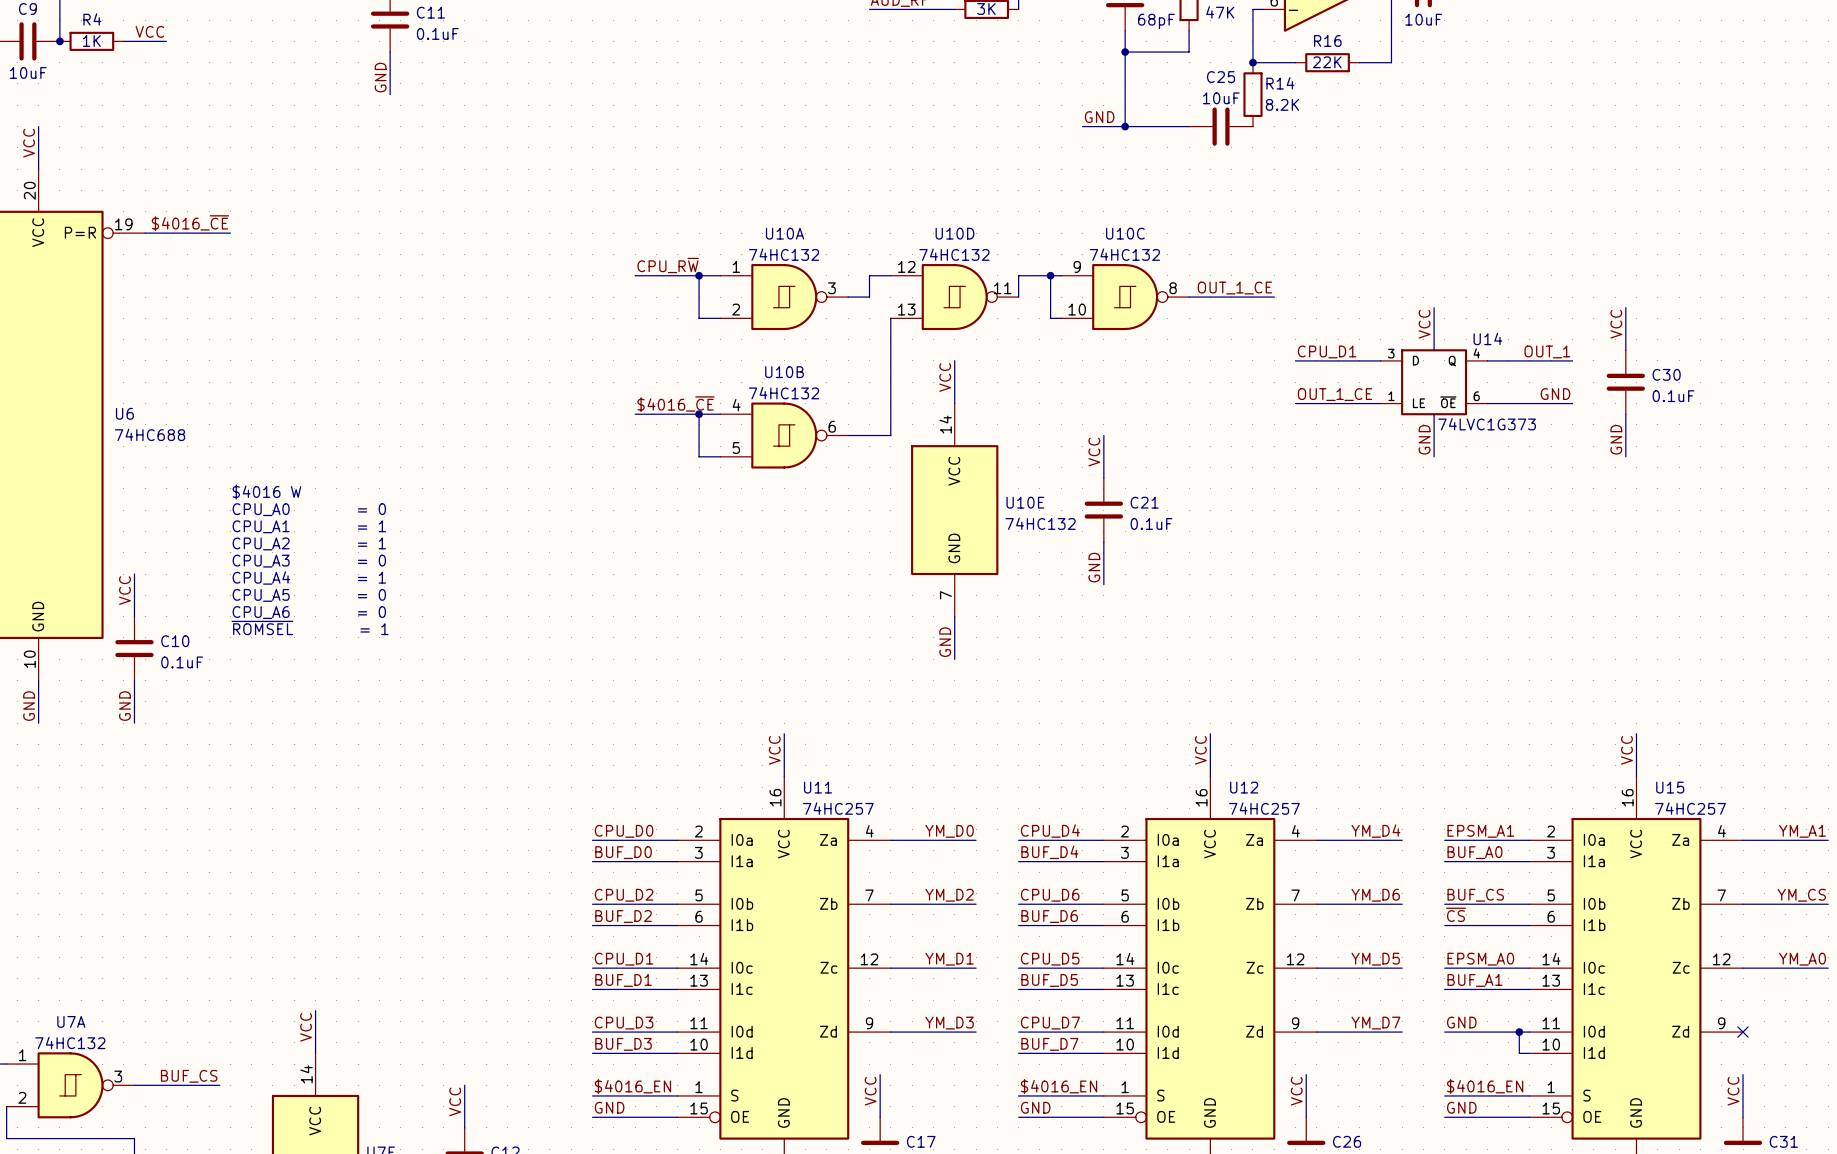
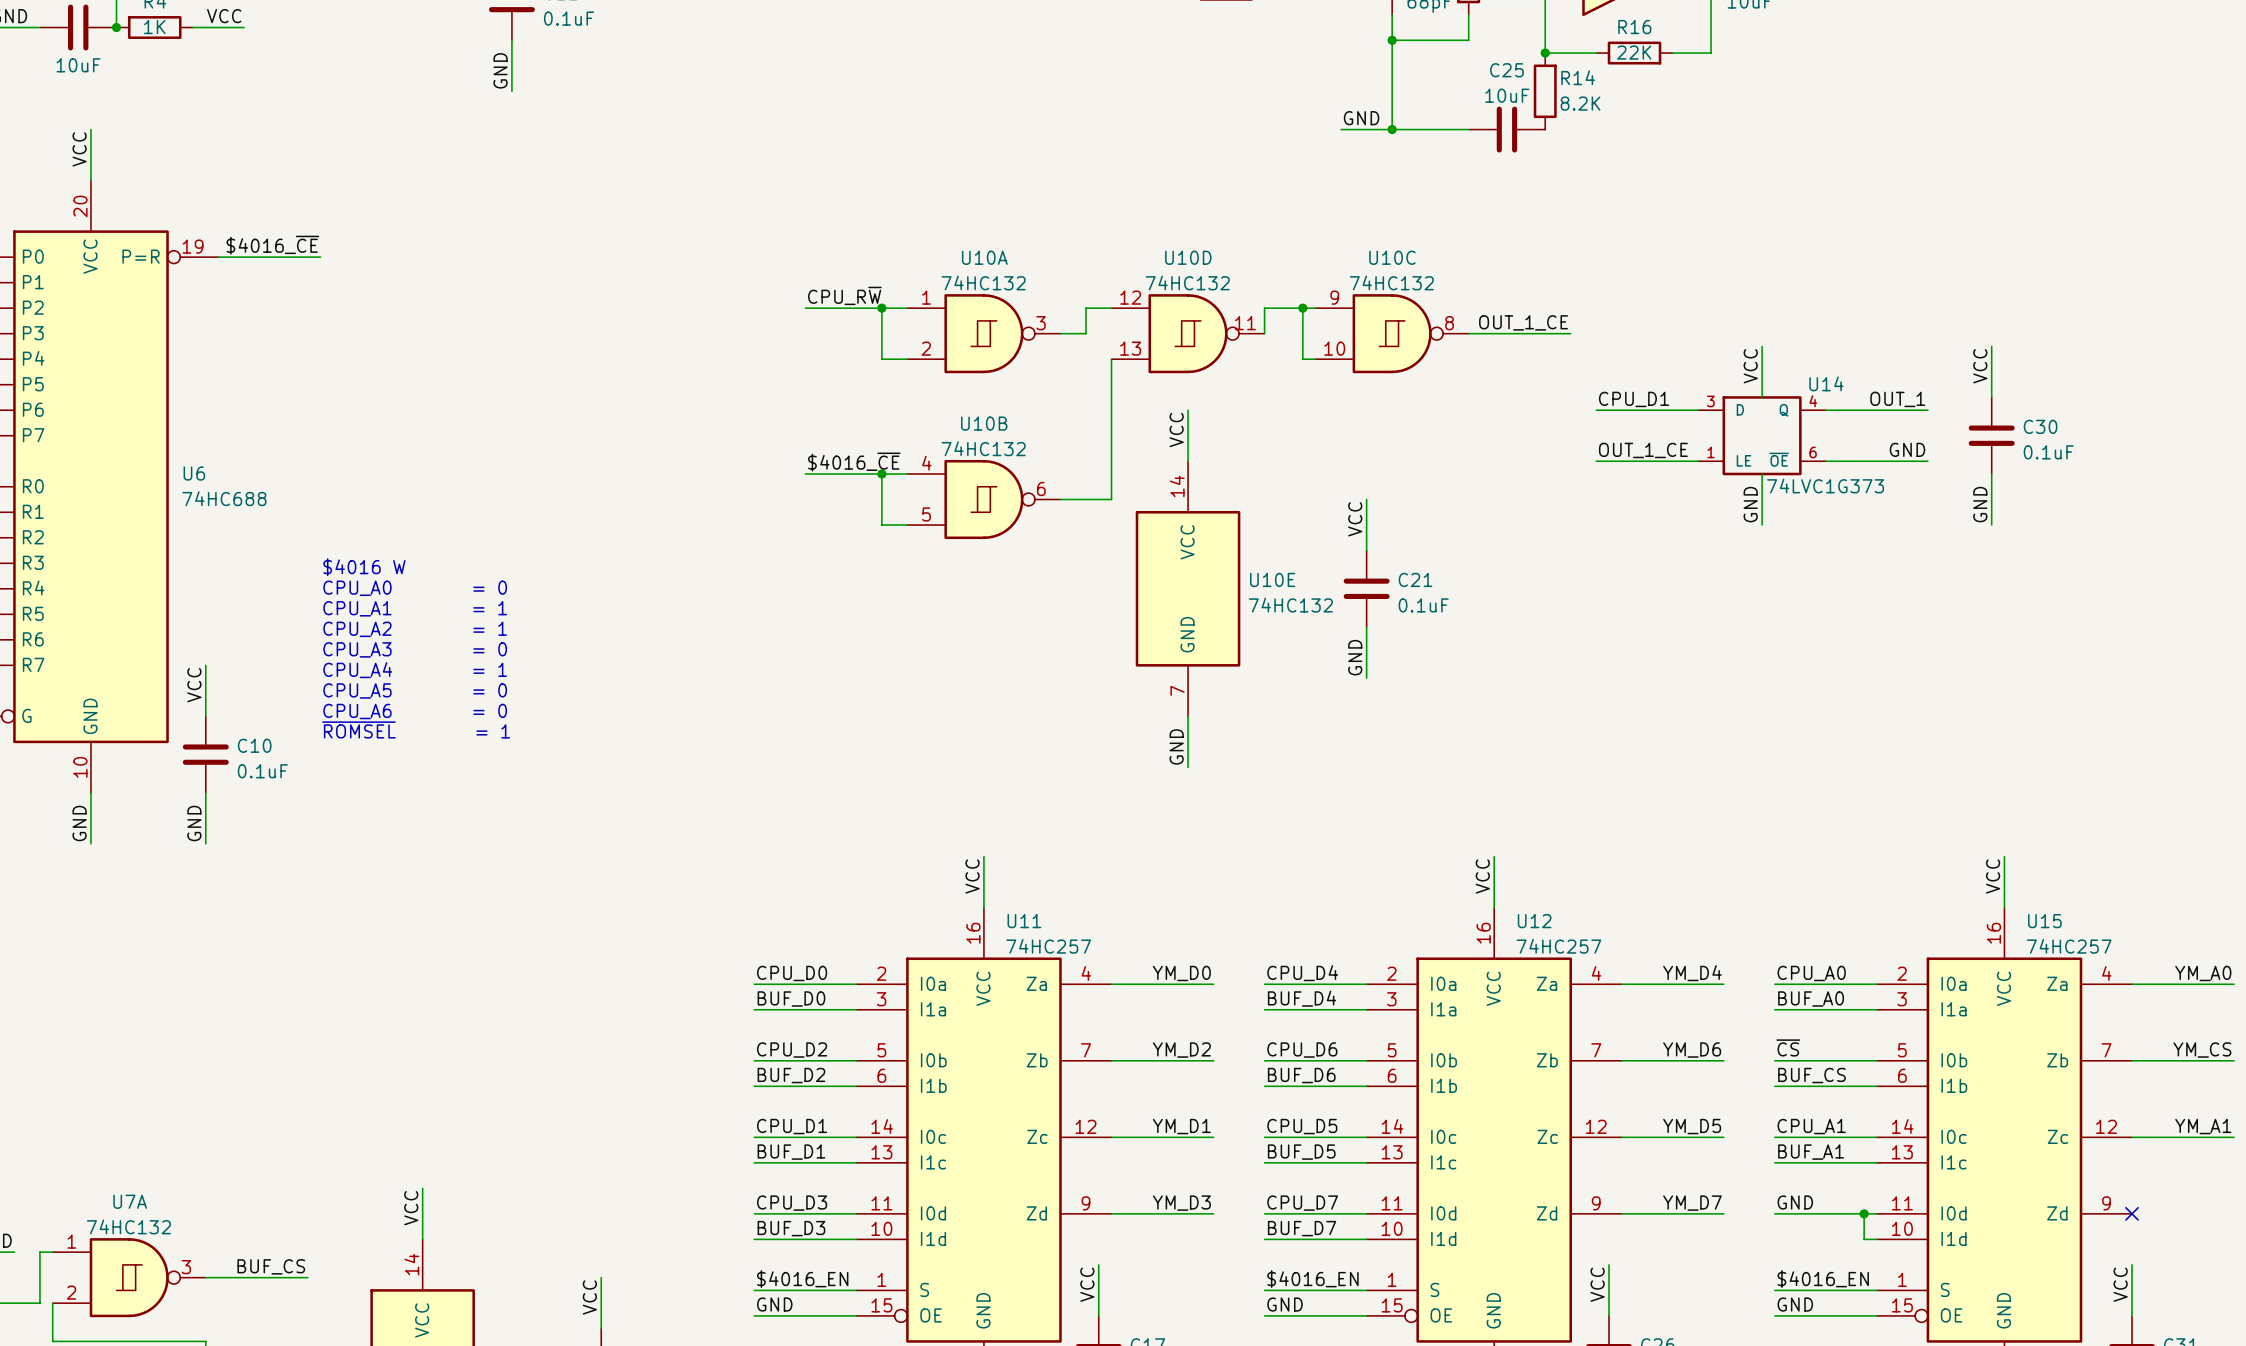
label: EPSM_A1 (1480, 831) -> CPU_A0 (1811, 973)
label: YM_A1 (1802, 831) -> YM_A0 (2203, 973)
label: BUF_CS (1475, 895) -> ~{CS} (1788, 1047)
label: ~{CS} (1455, 914) -> BUF_CS (1811, 1075)
label: EPSM_A0 (1480, 959) -> CPU_A1 (1811, 1126)
label: YM_A0 (1802, 959) -> YM_A1 (2203, 1126)

